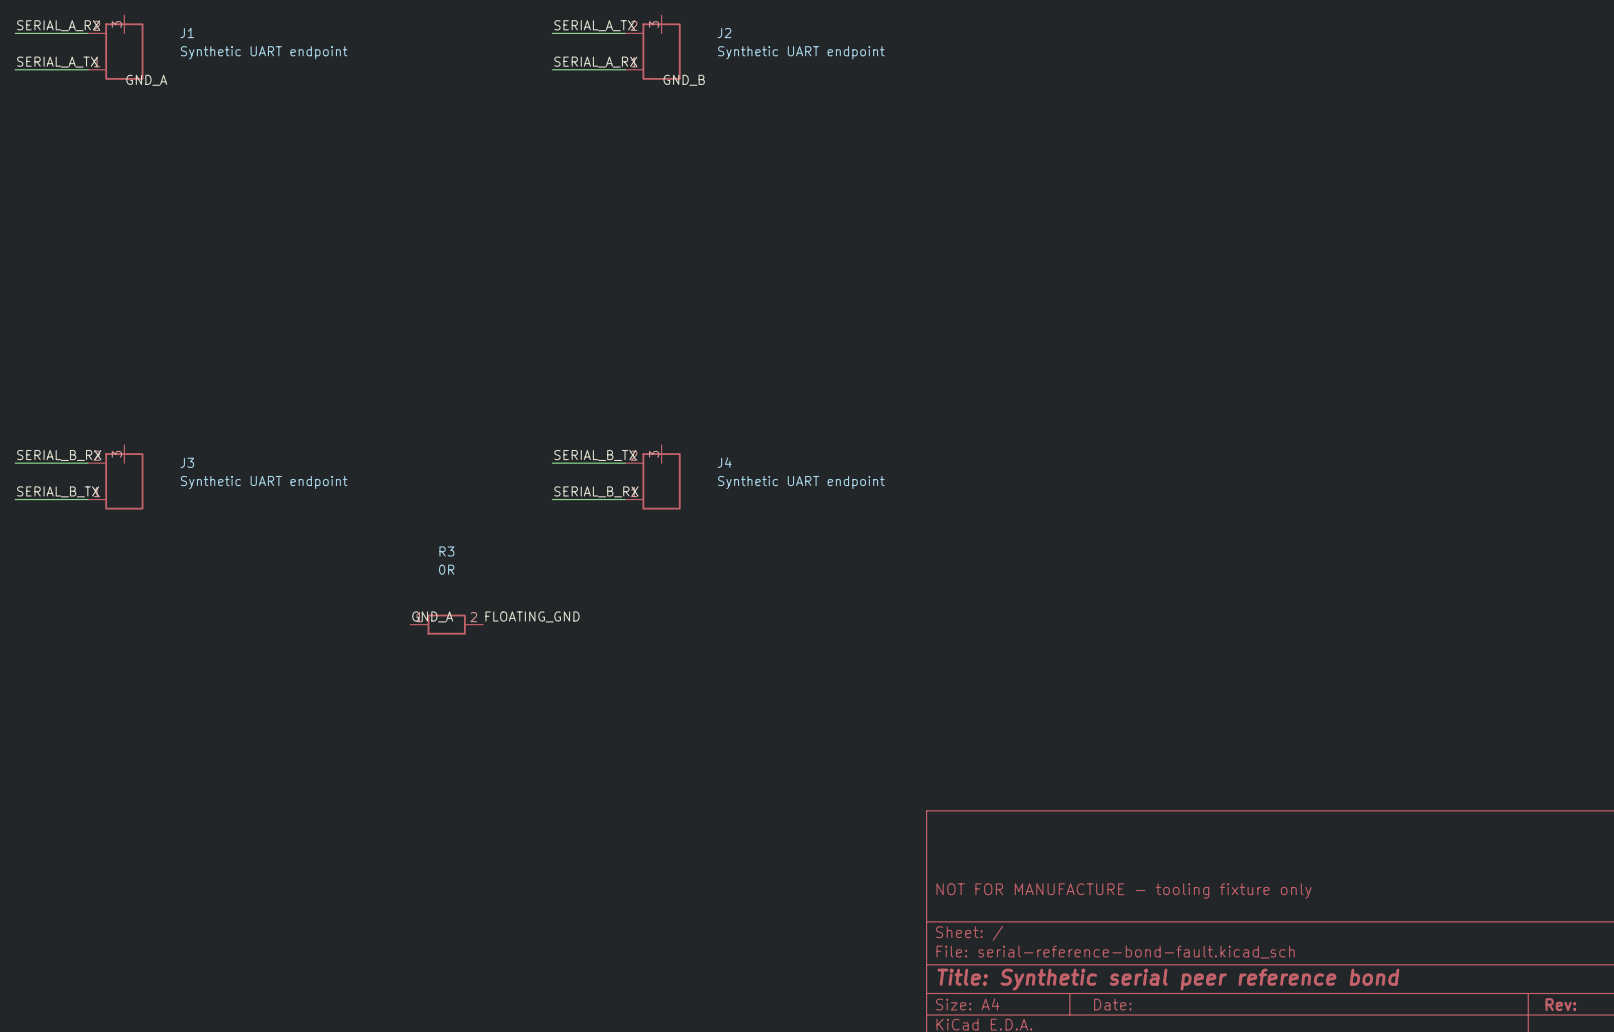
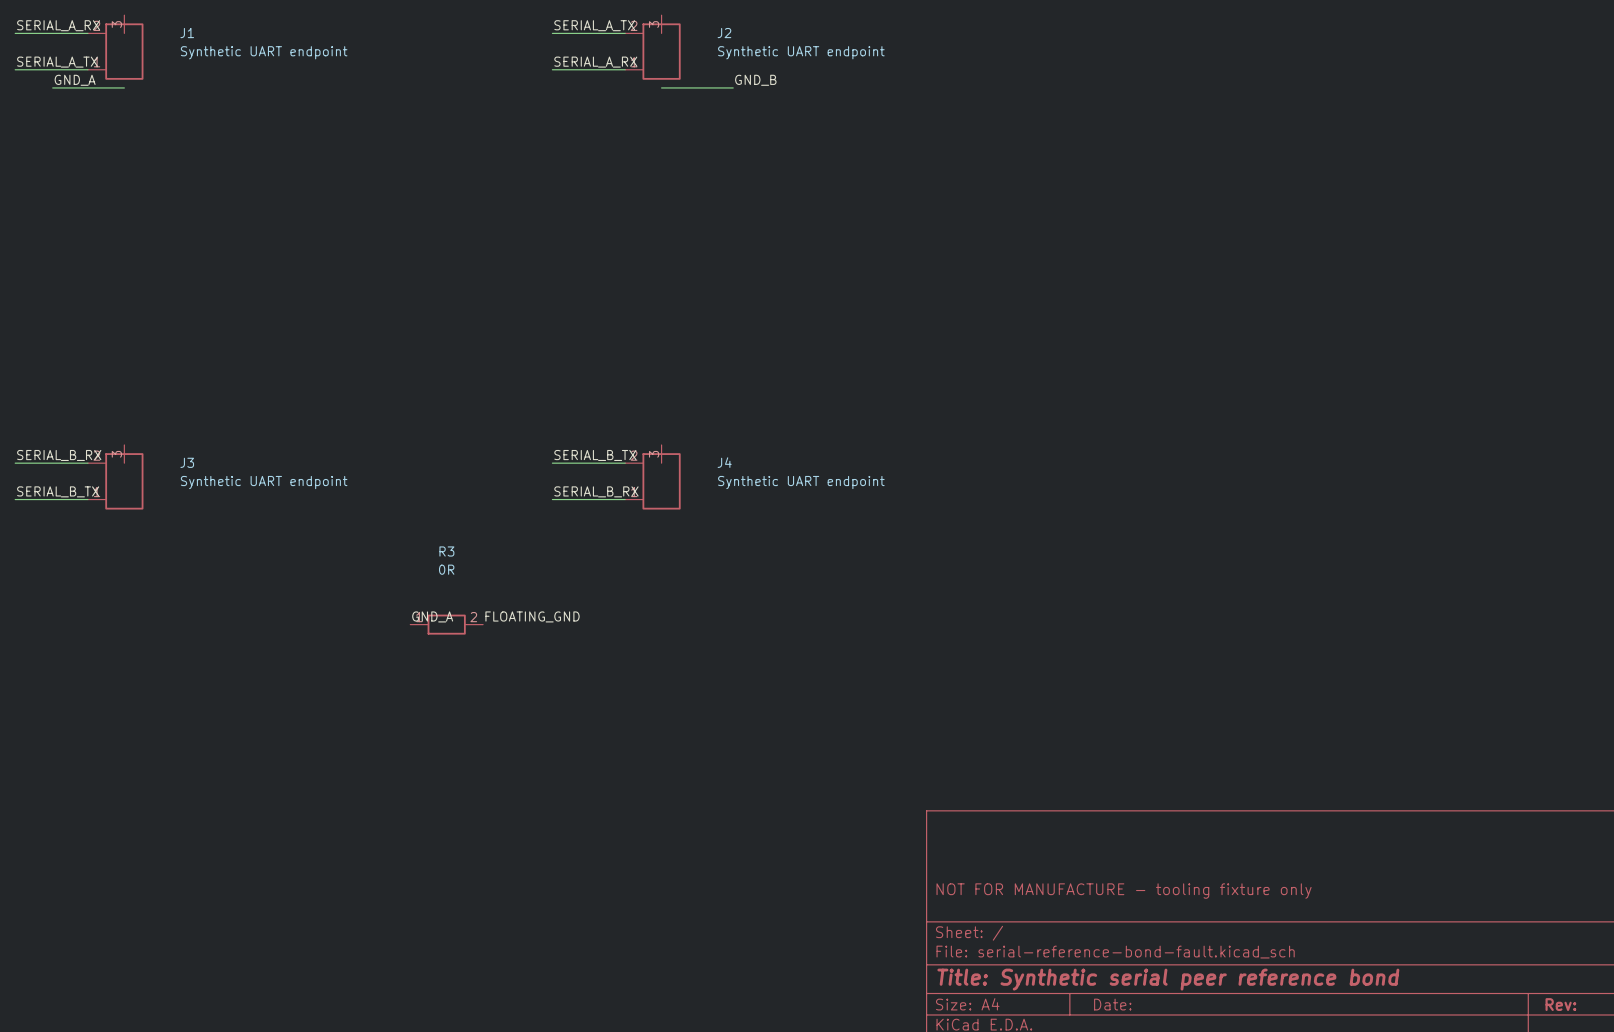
label position: GND_A (146, 80) -> GND_A (75, 80)
label position: GND_B (684, 80) -> GND_B (755, 80)
wire: none -> (52, 87) (124, 87)
wire: none -> (661, 87) (733, 87)

